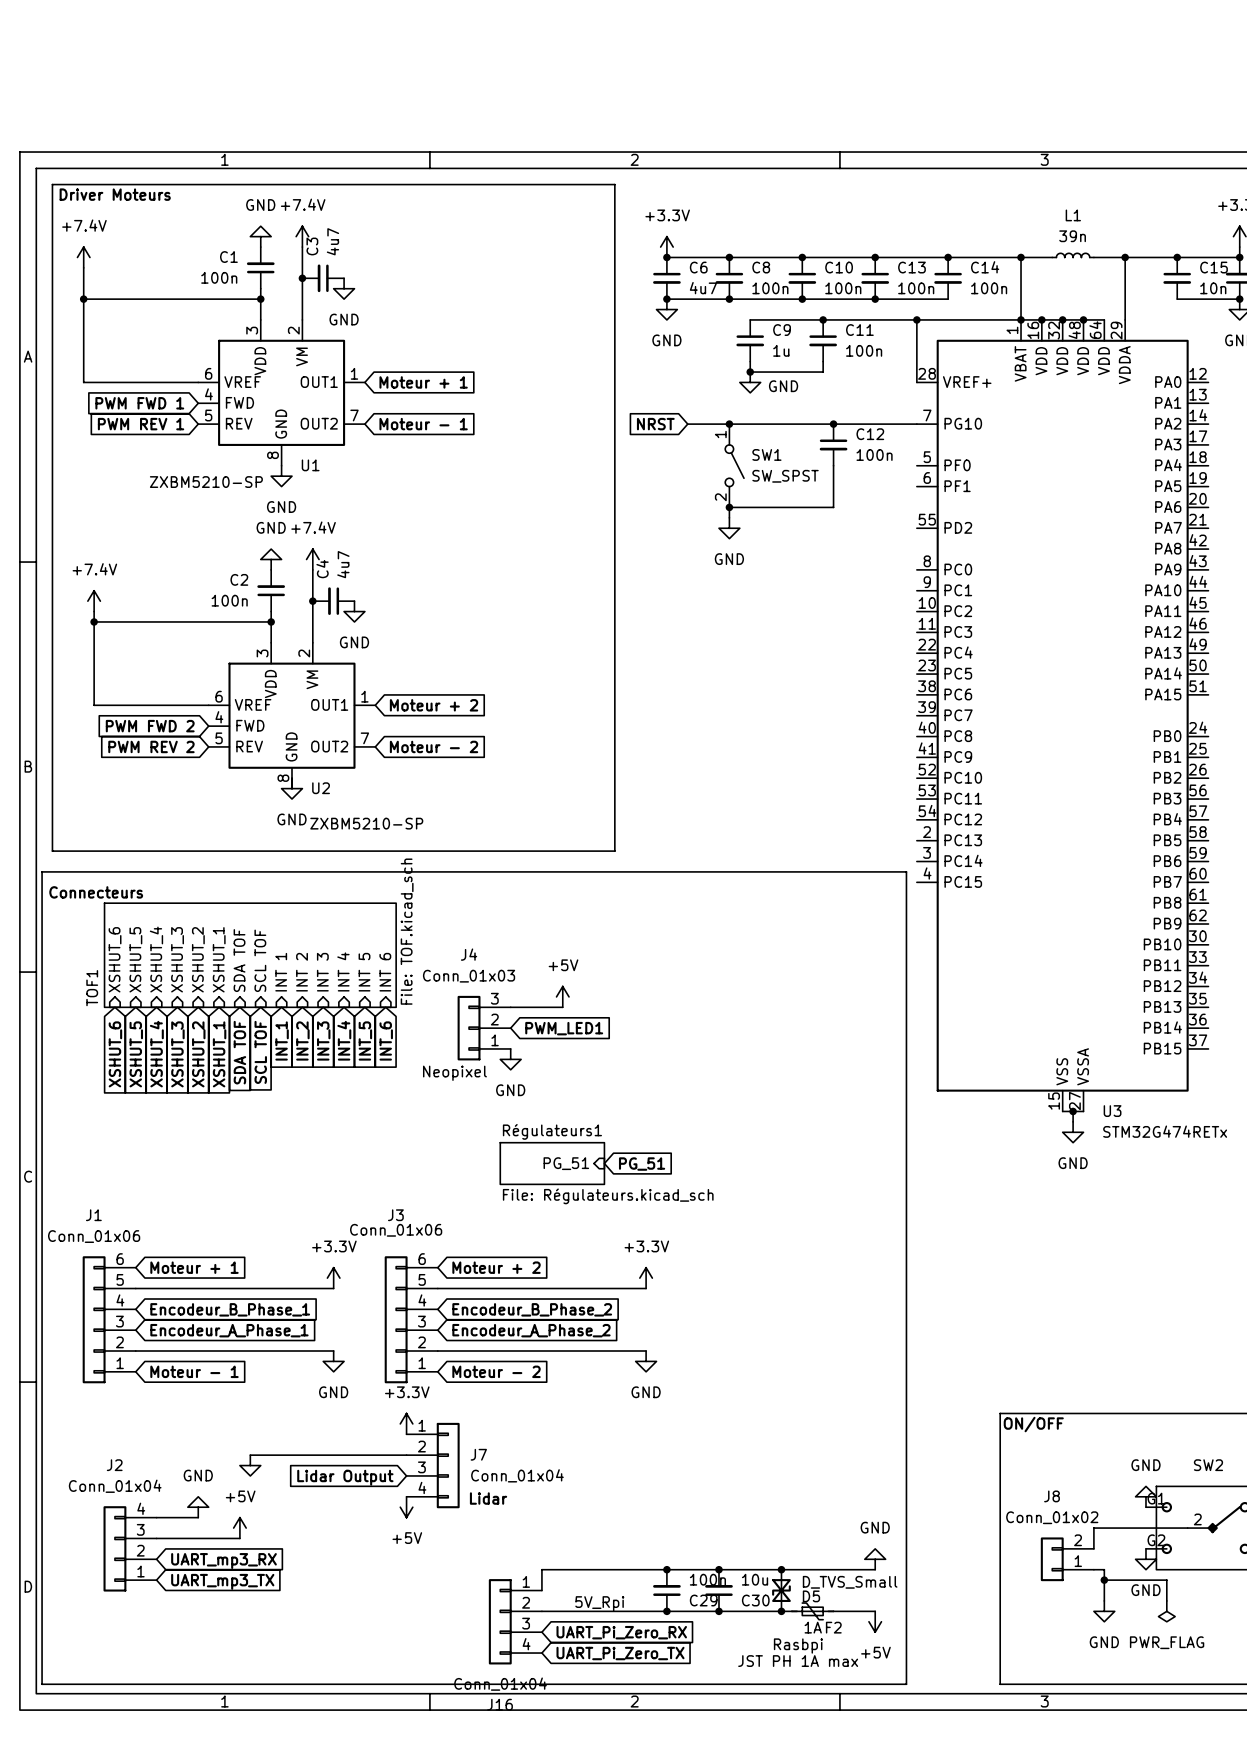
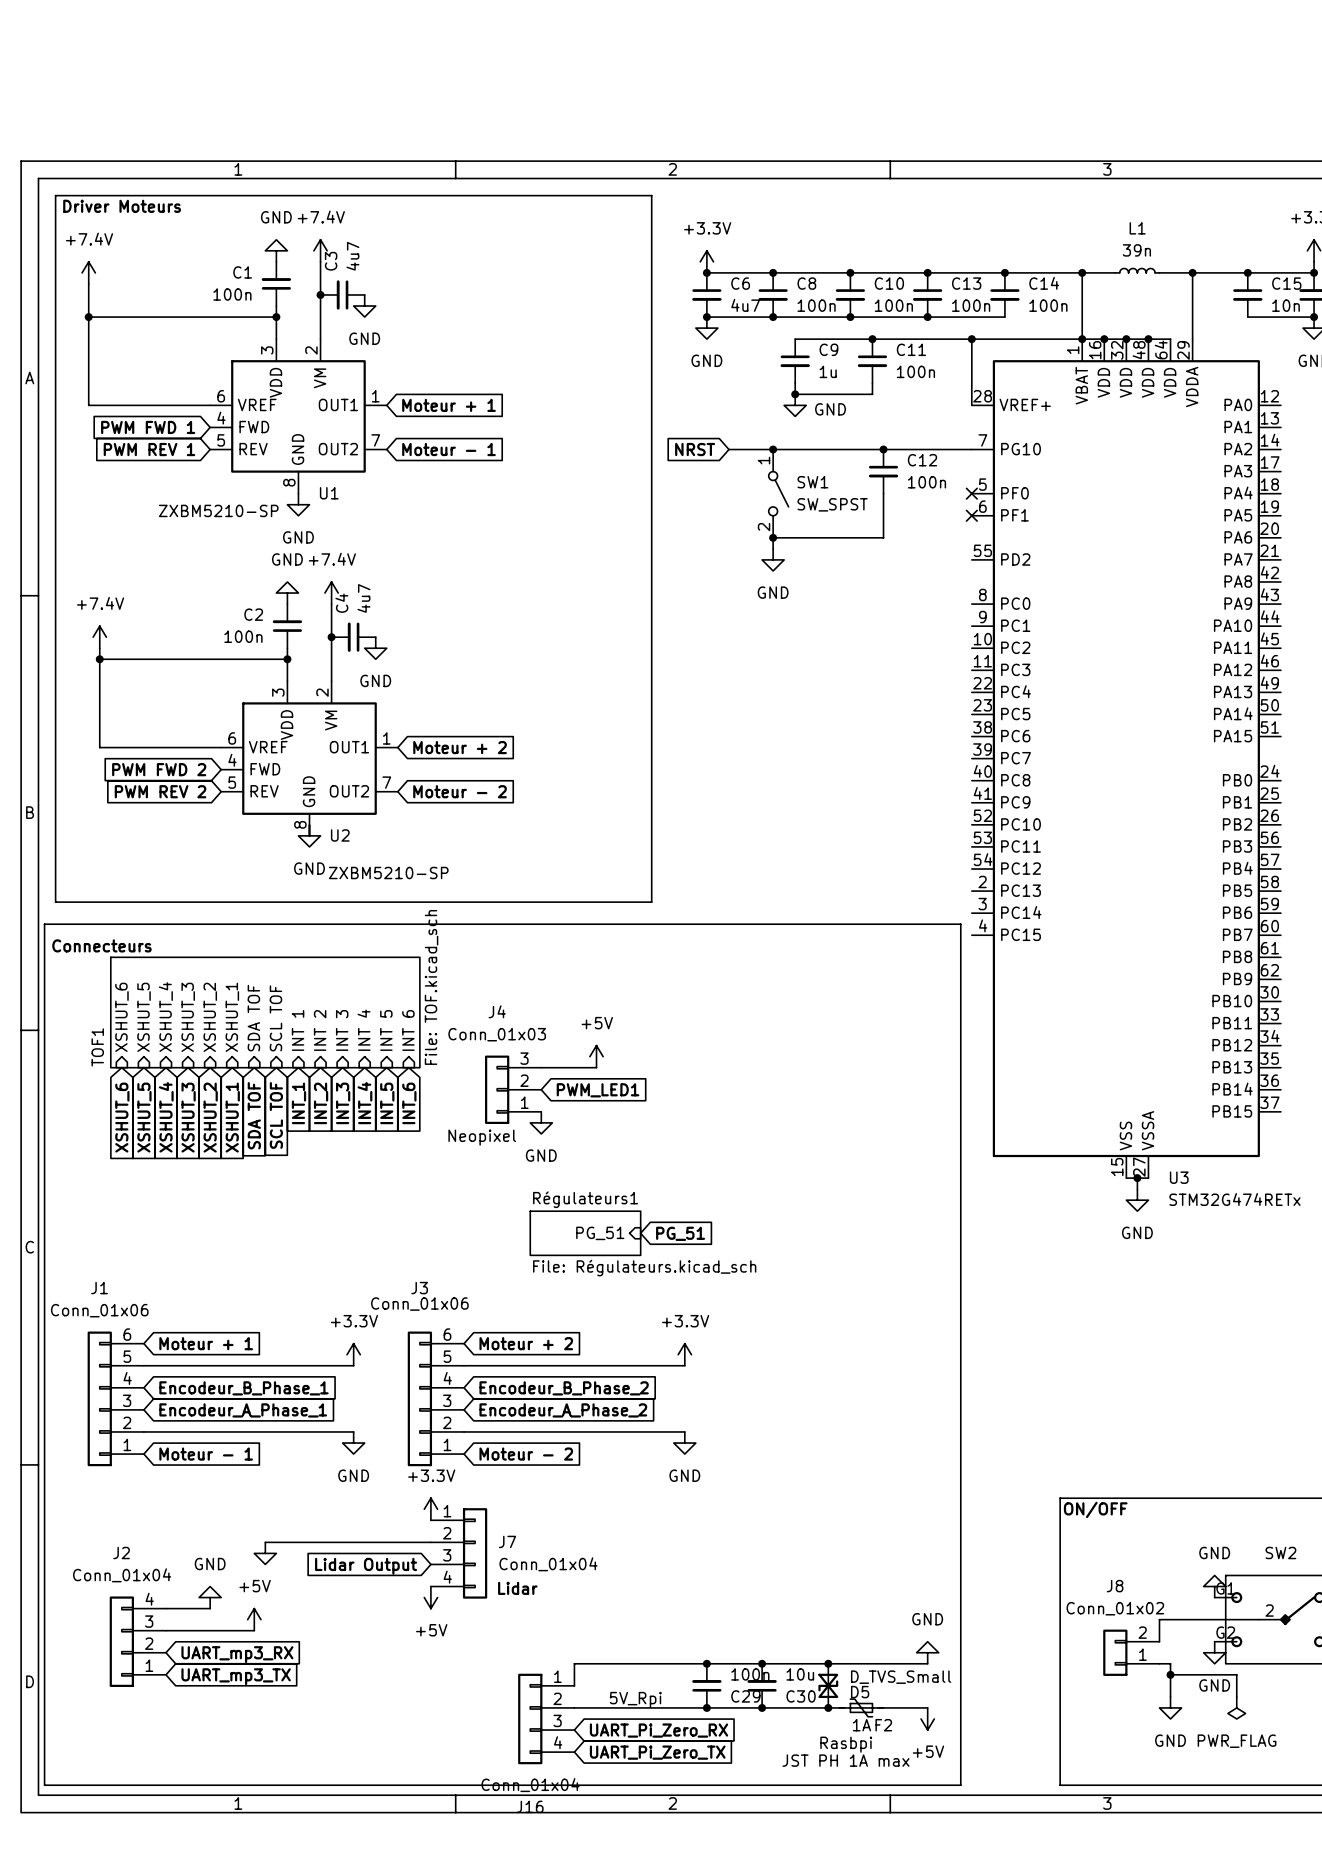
no-connect mark: none -> (971, 493)
no-connect mark: none -> (971, 515)

